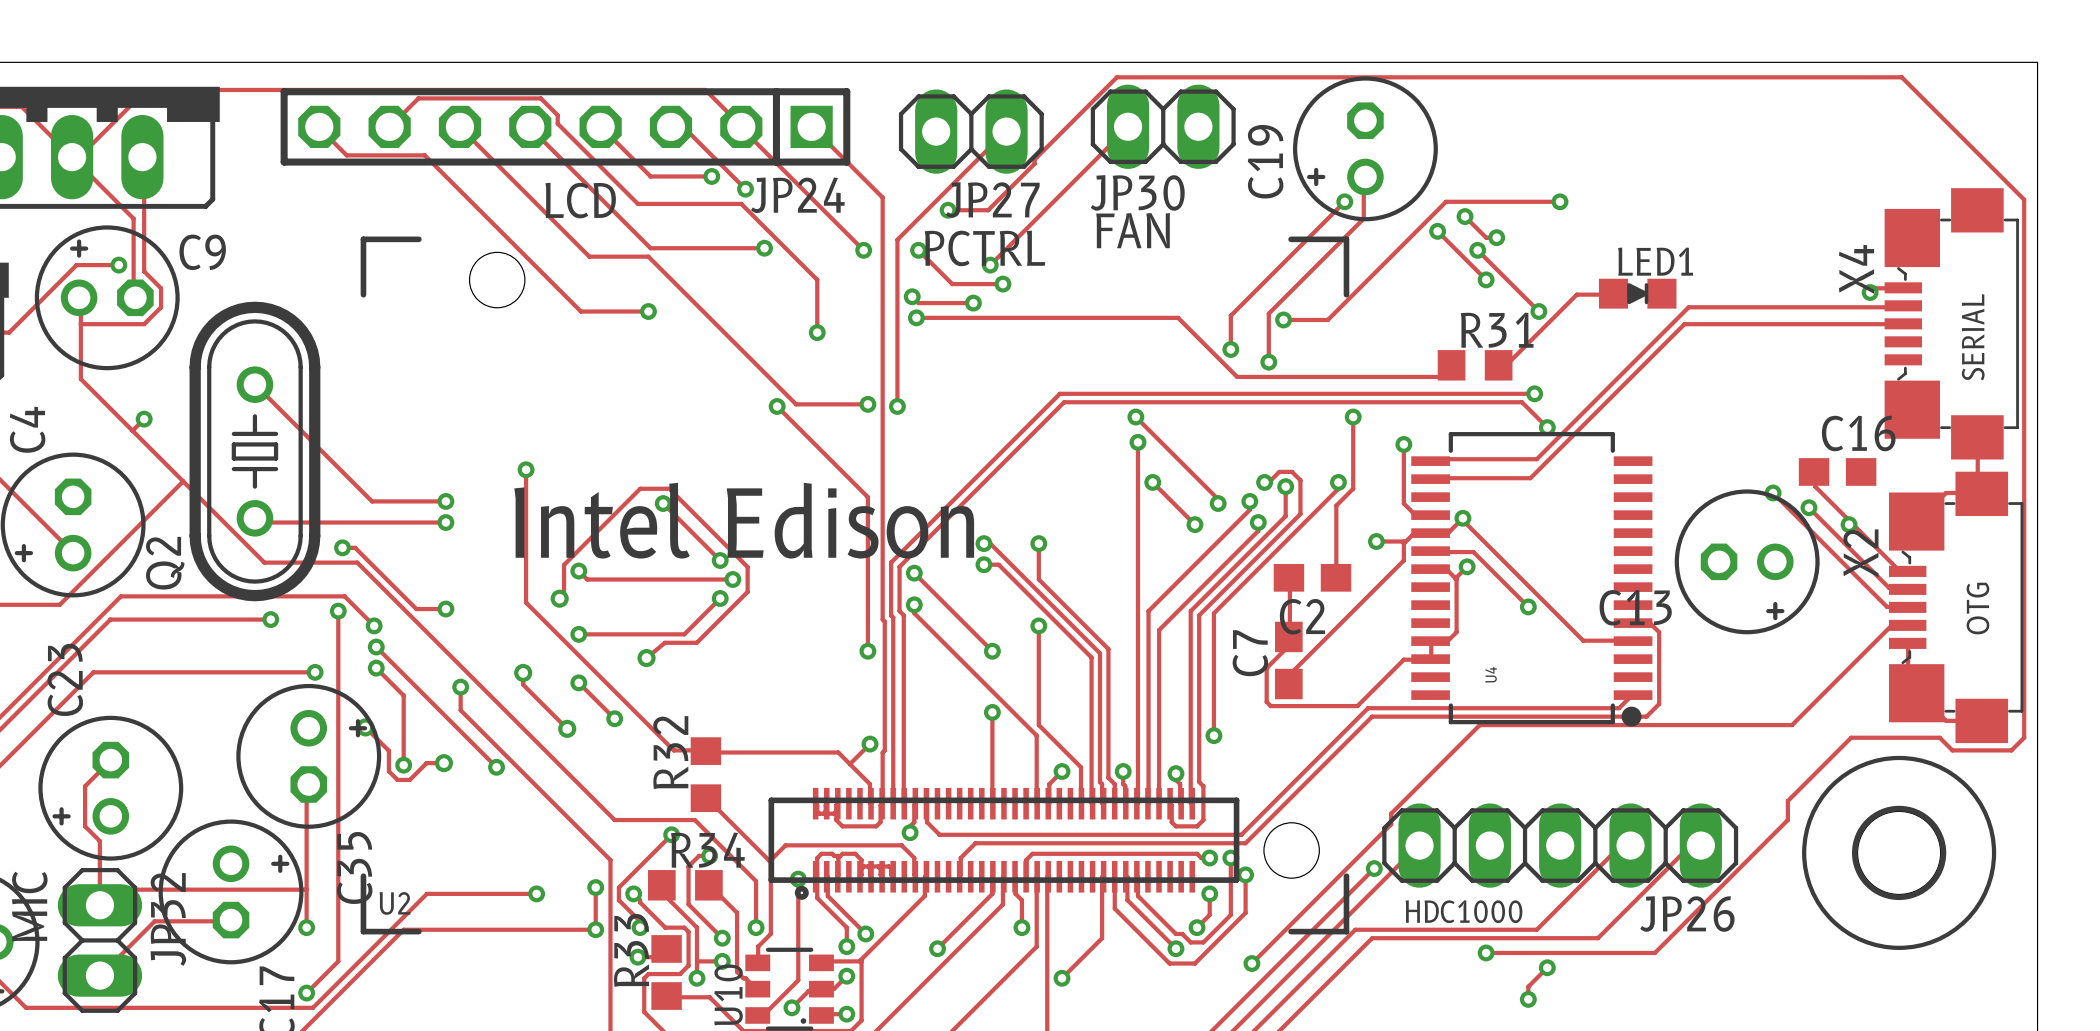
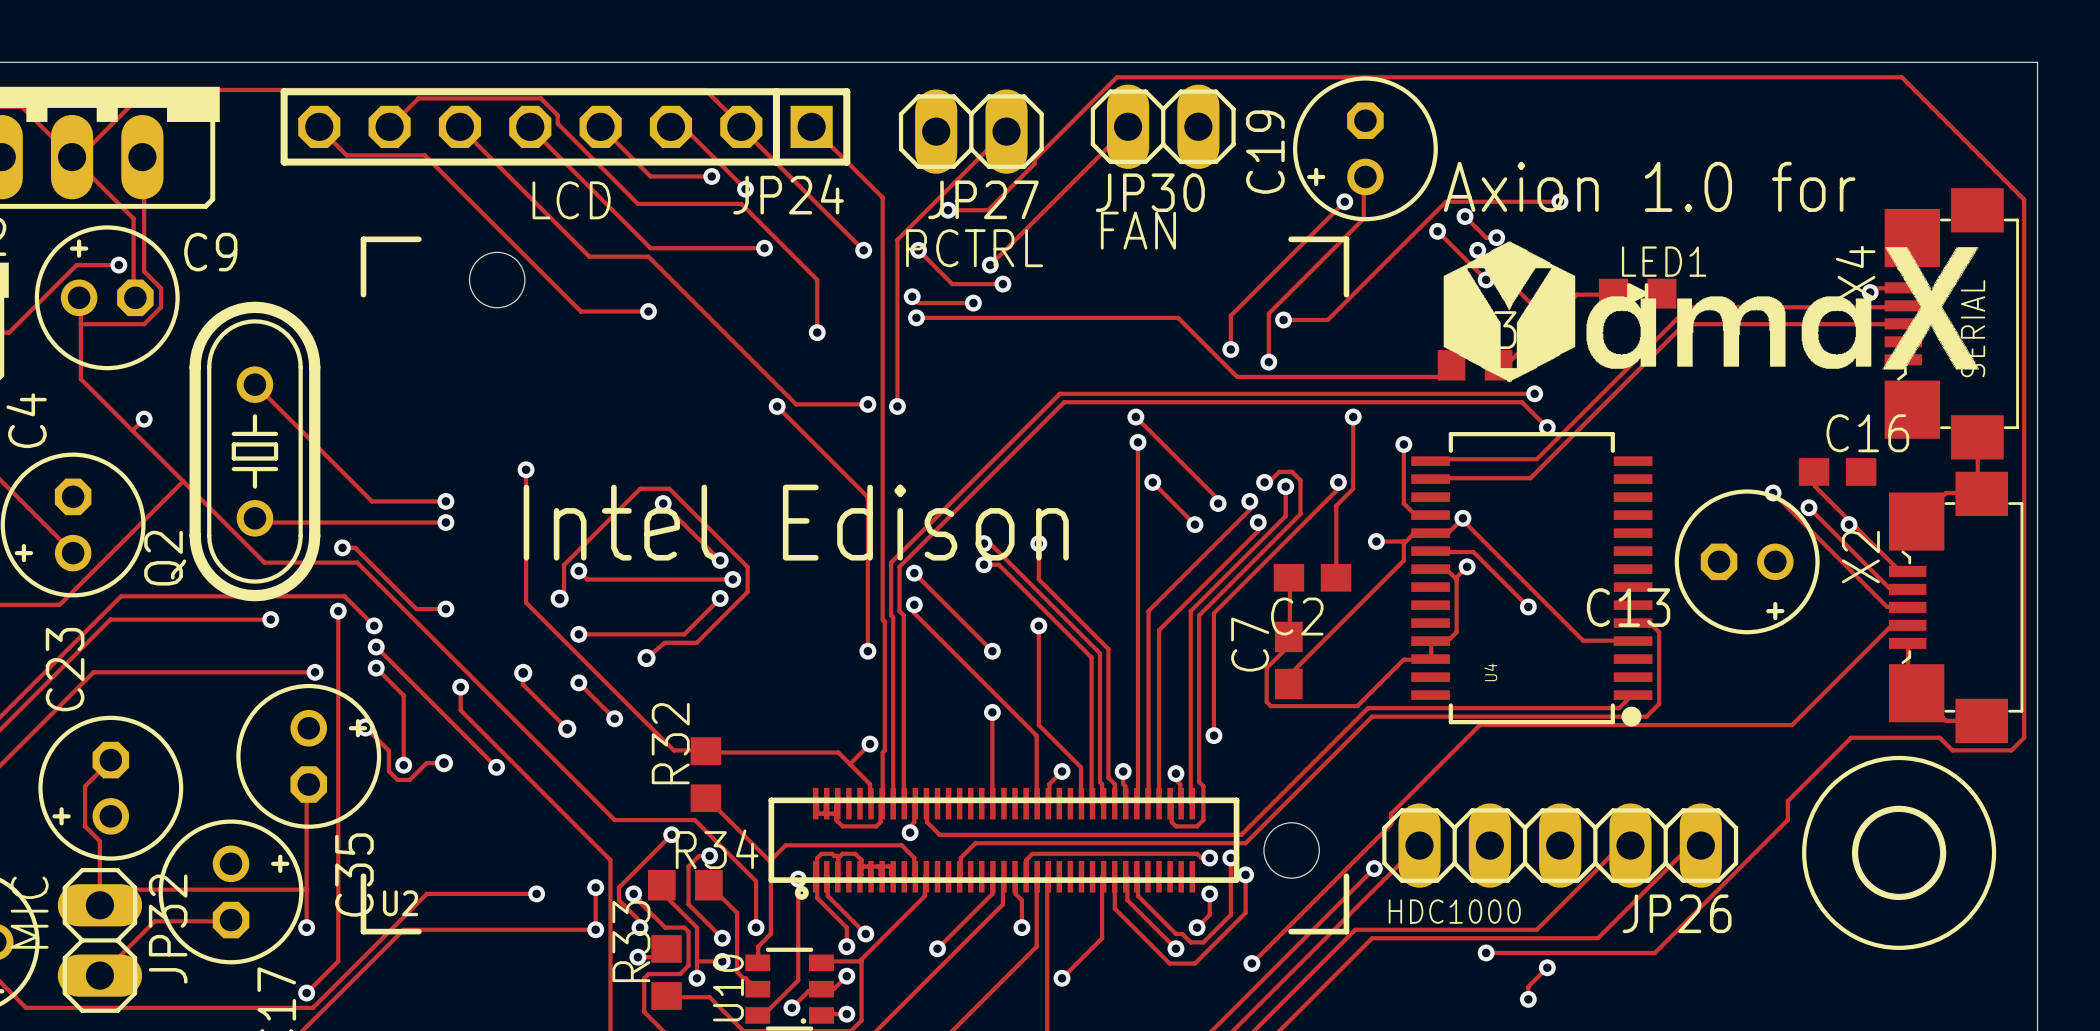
text: none -> Axion 1.0 for (1649, 186)
drawing: none -> [1443, 241, 1979, 383]
text: OTG (1977, 608) -> none

